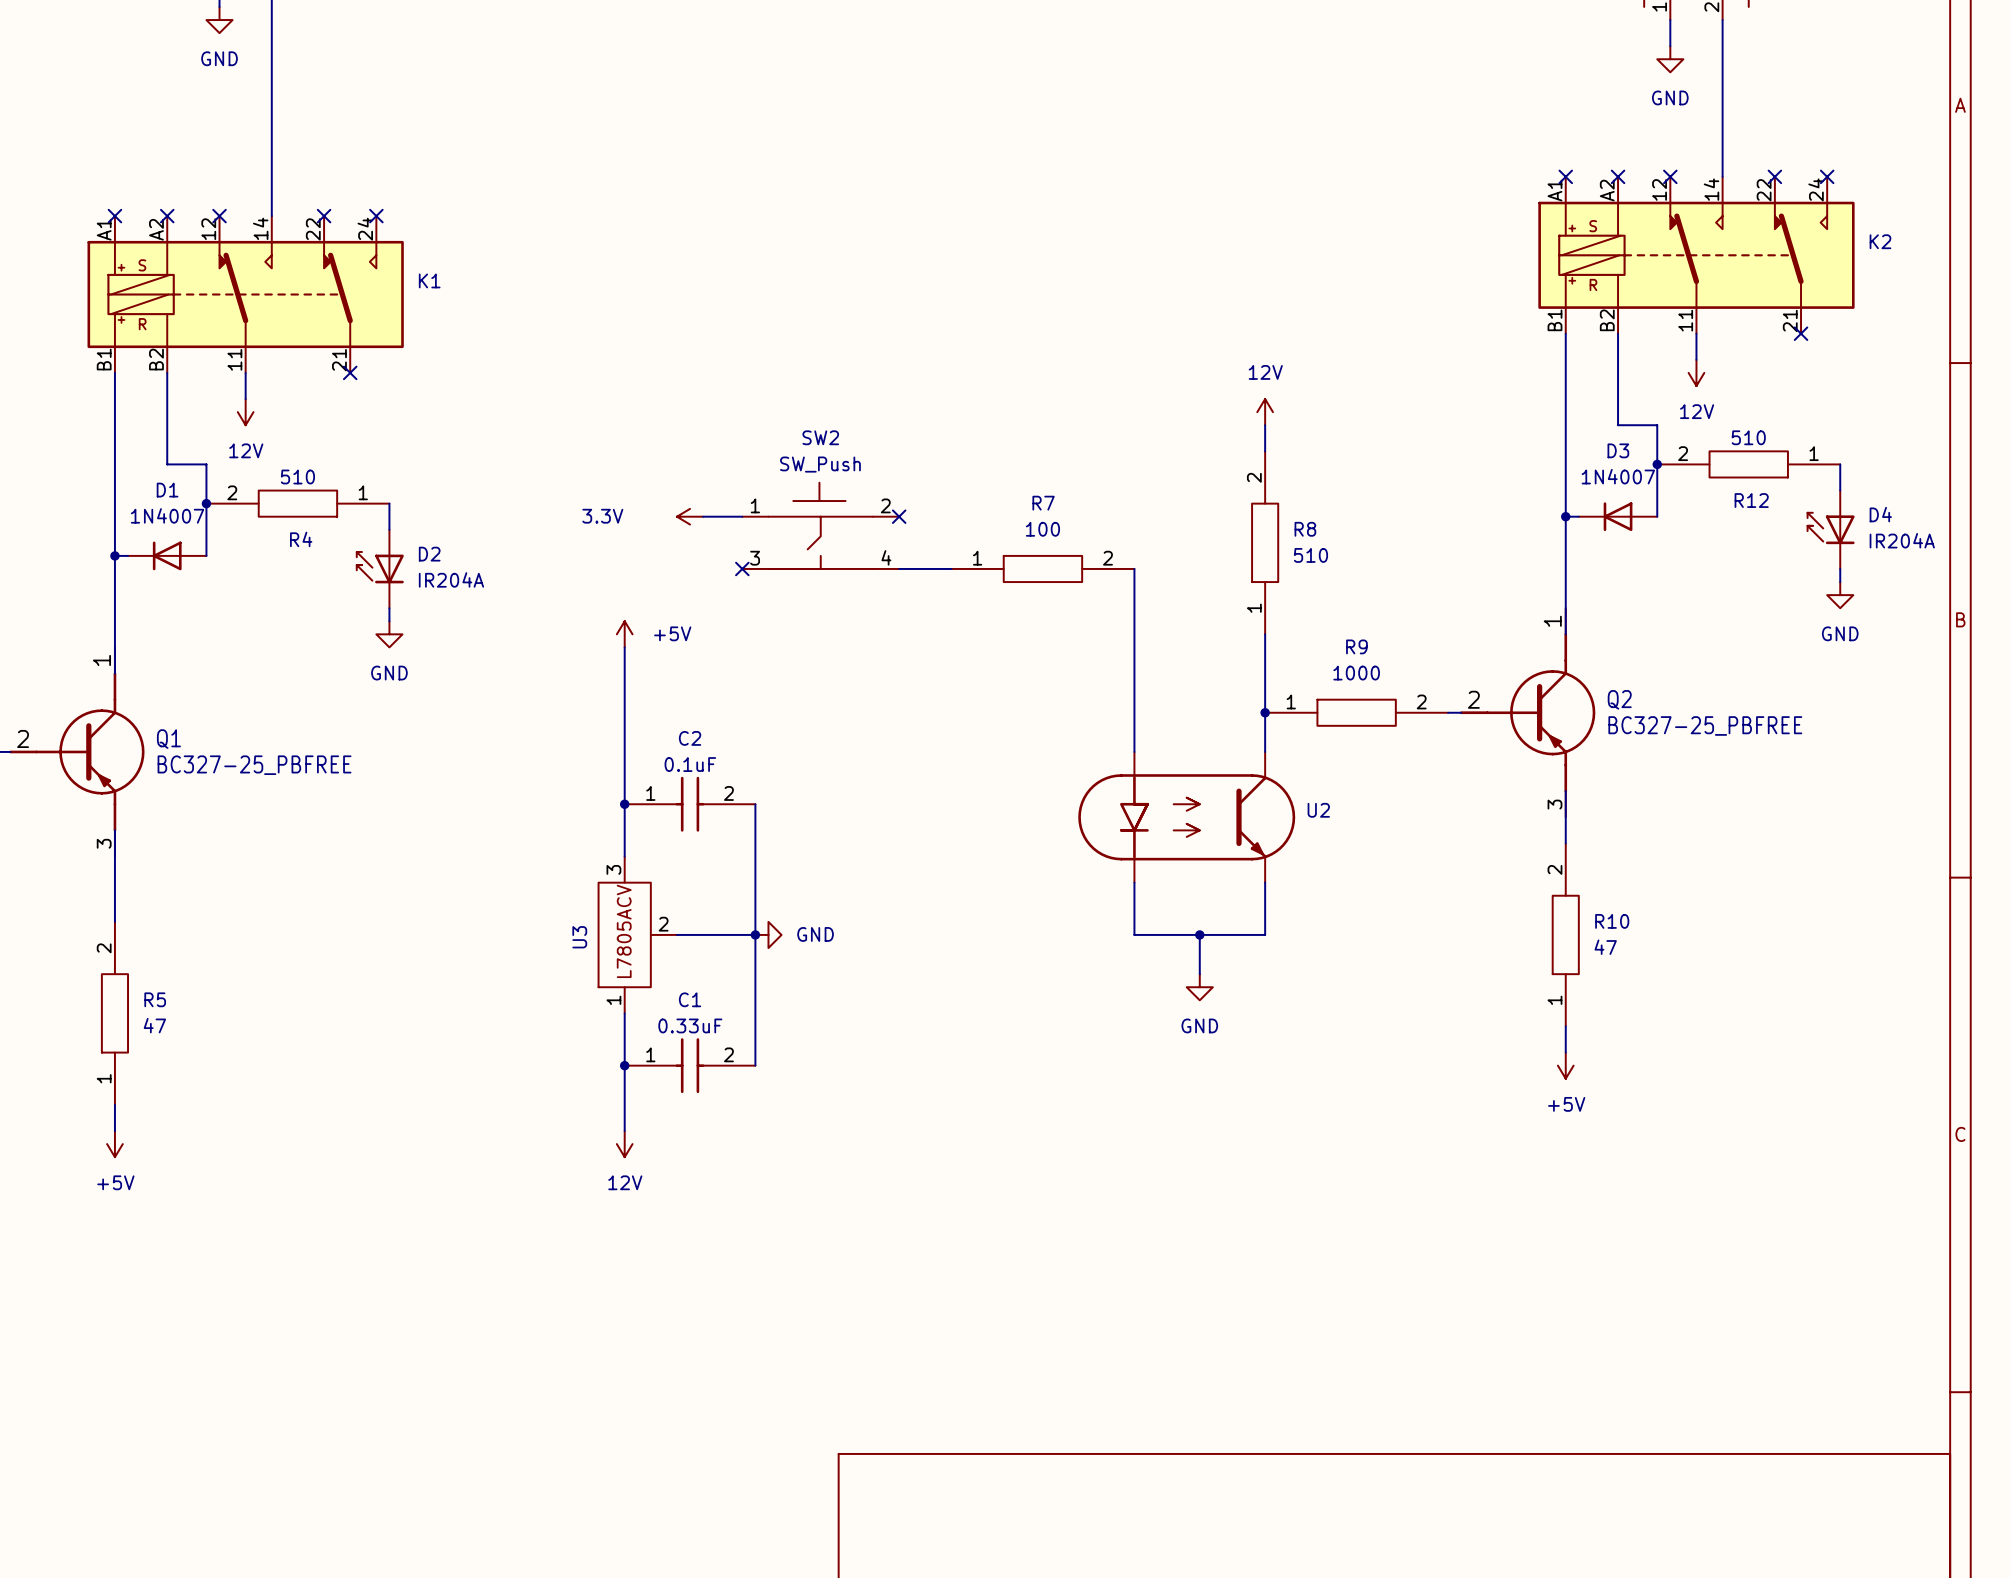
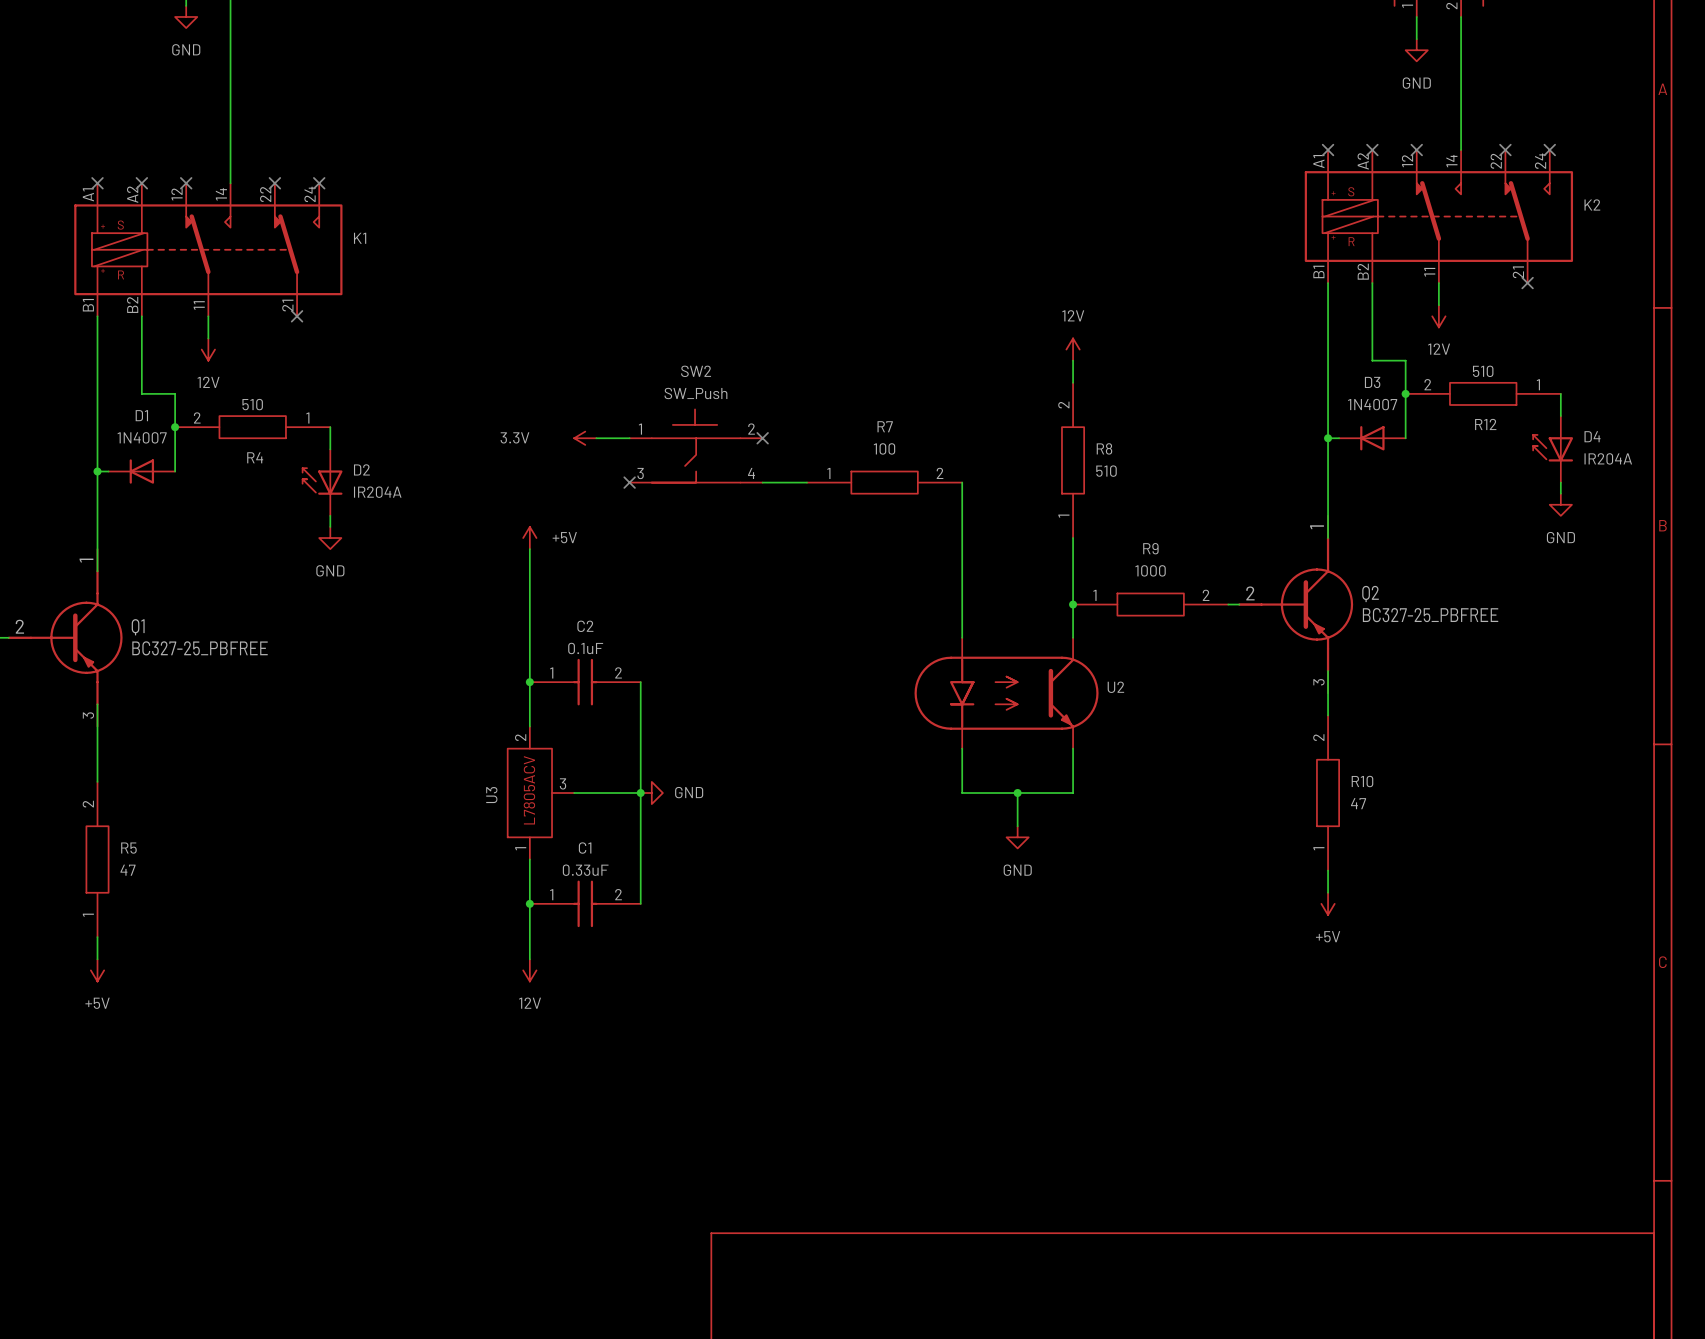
U3 pin number: 3 (613, 869) -> 2 (520, 737)
U3 pin number: 2 (663, 924) -> 3 (562, 783)

